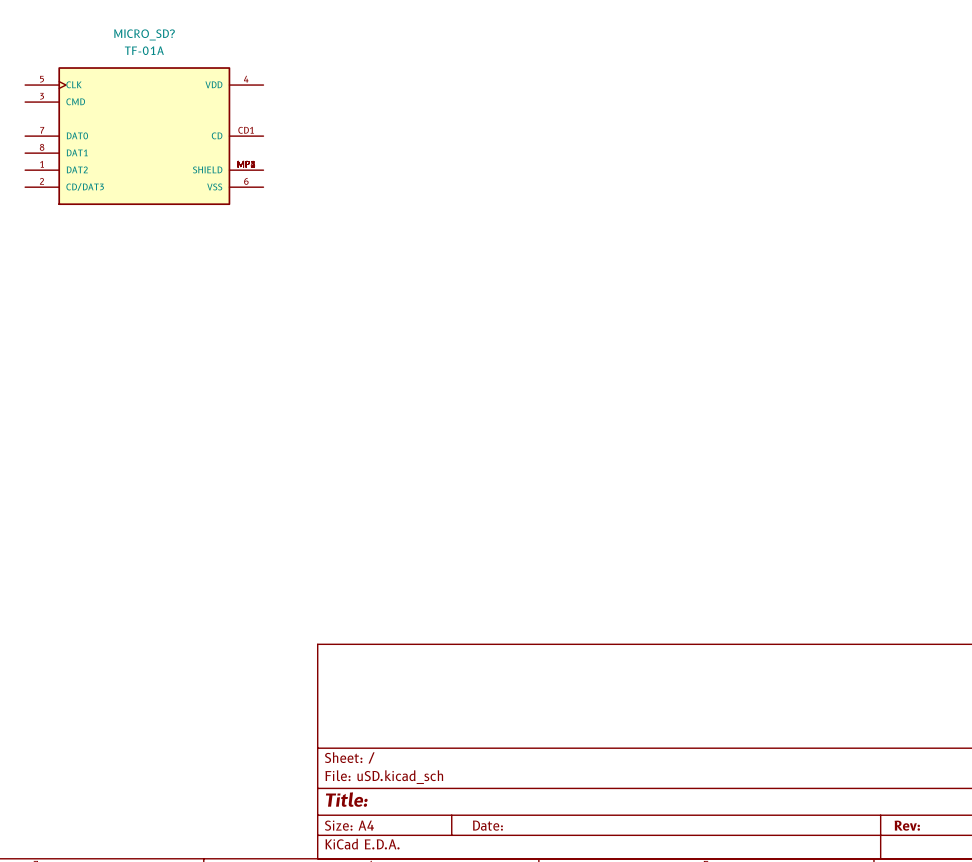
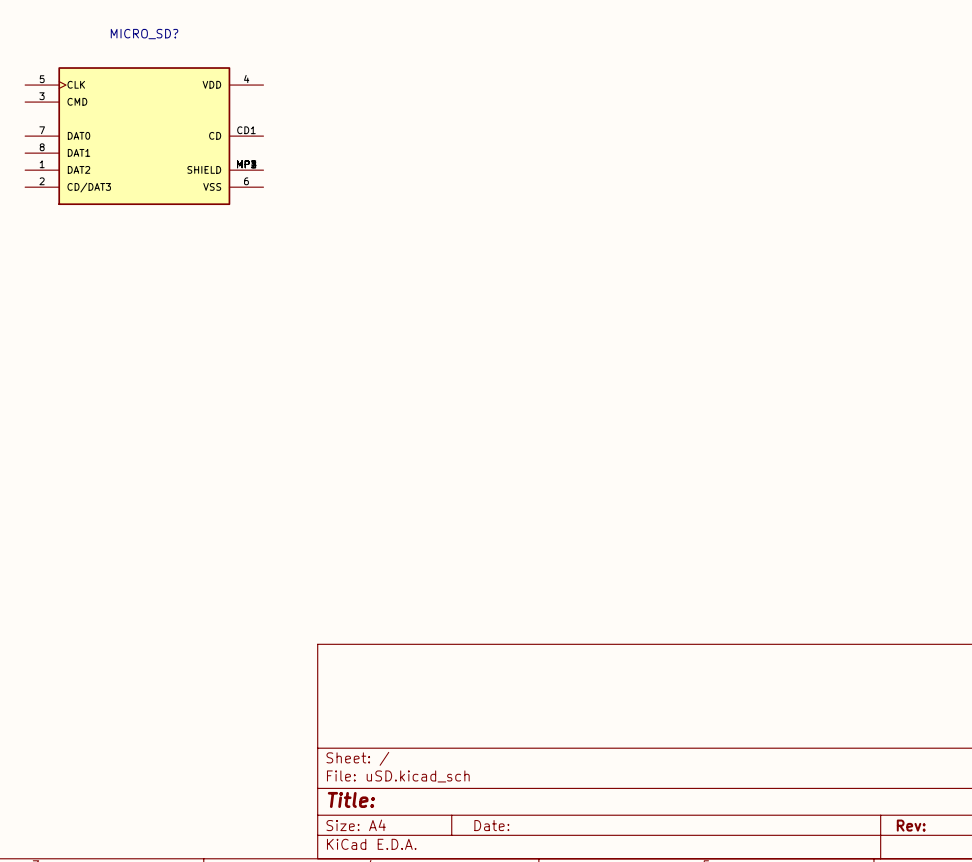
MICRO_SD? value: TF-01A (144, 50) -> none

